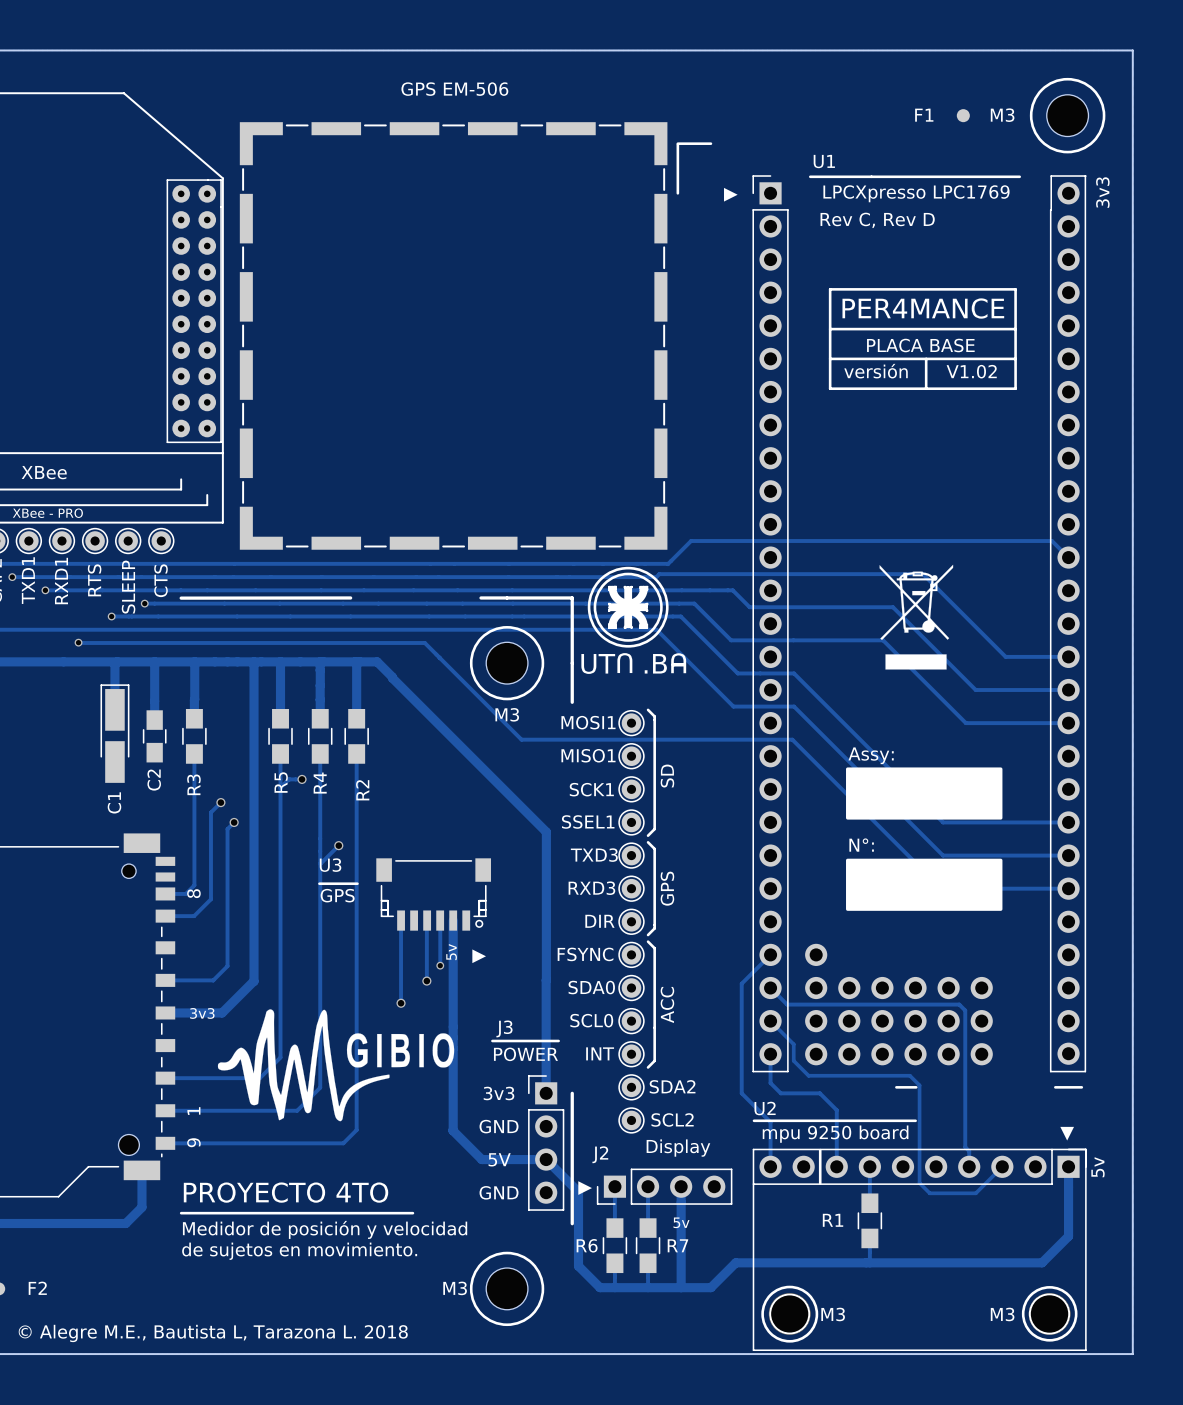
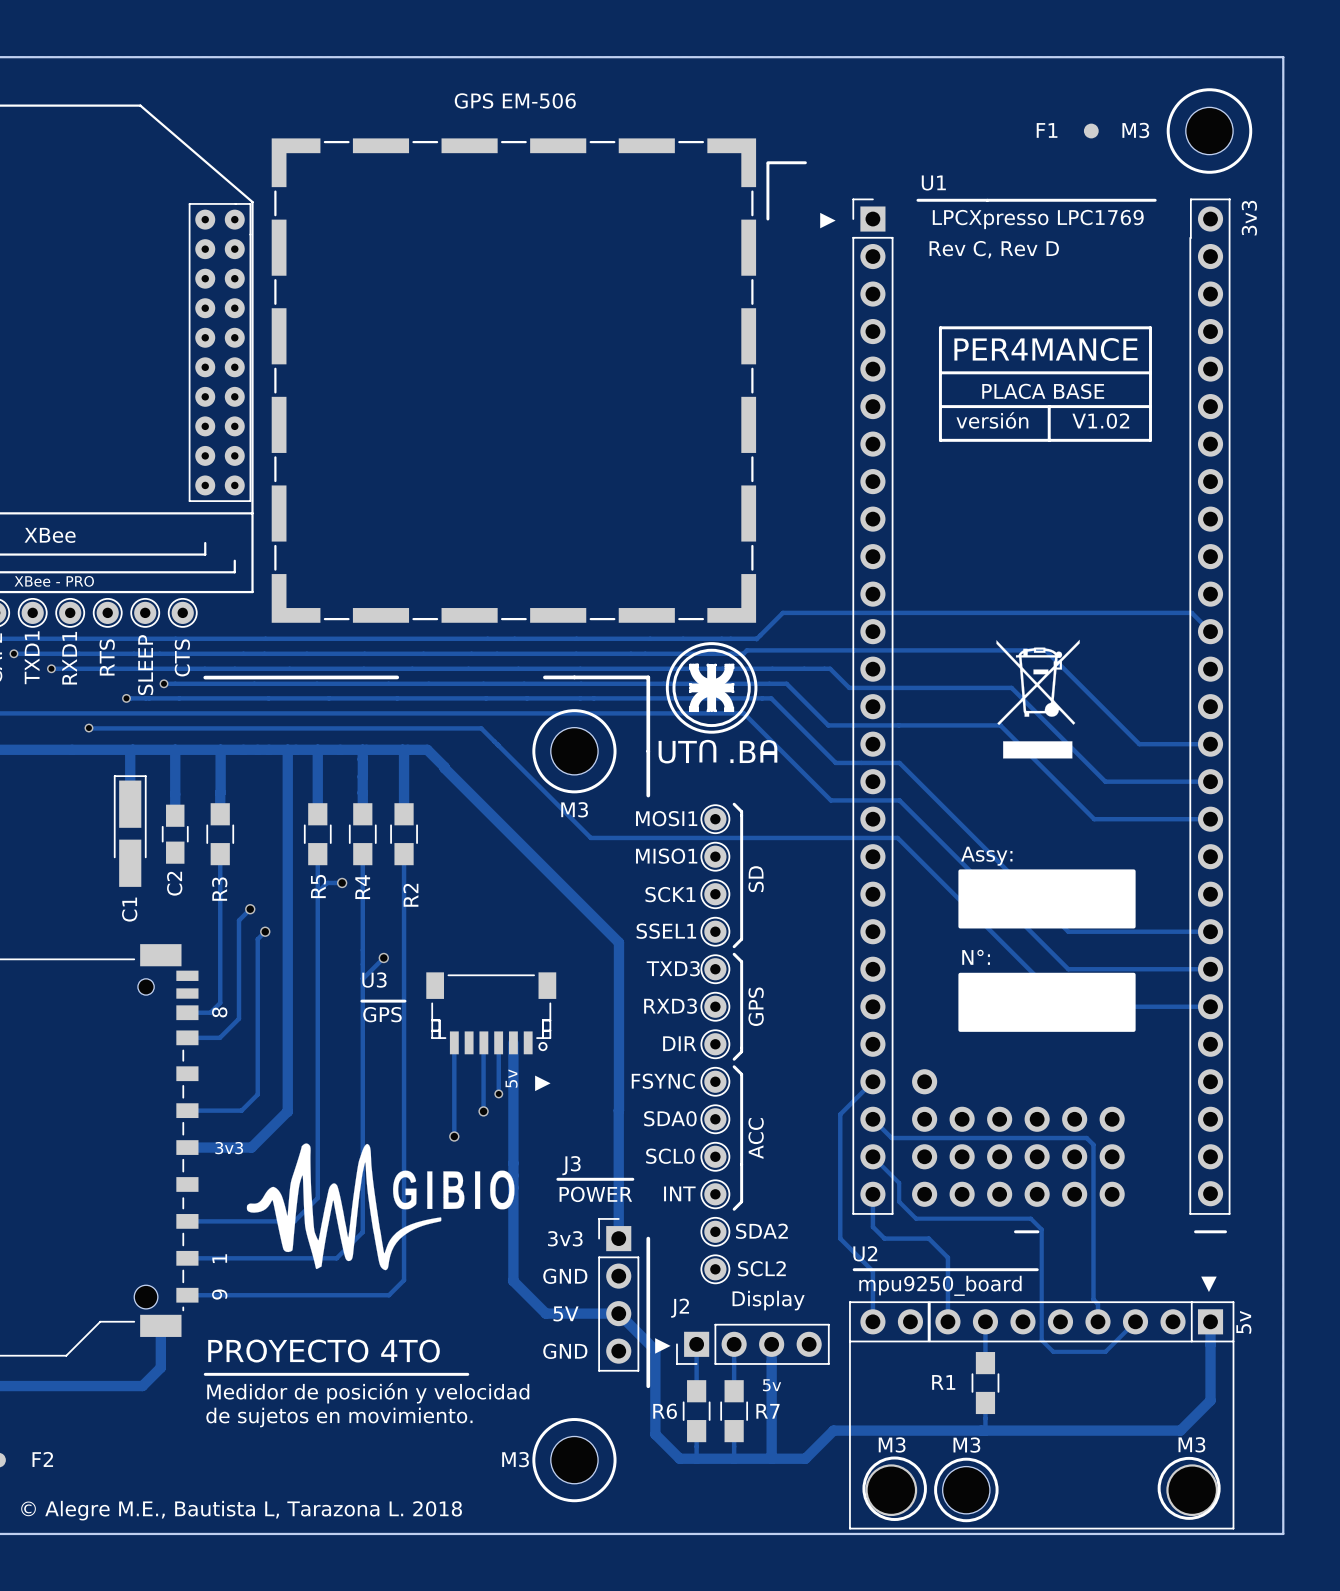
U2 footprint: [752, 1148, 1087, 1352] -> [849, 1301, 1235, 1530]
drawing: none -> [934, 1457, 999, 1523]
text position: M3 (833, 1314) -> M3 (892, 1444)
text position: M3 (1002, 1314) -> M3 (1191, 1444)
M3: none -> (966, 1490)

